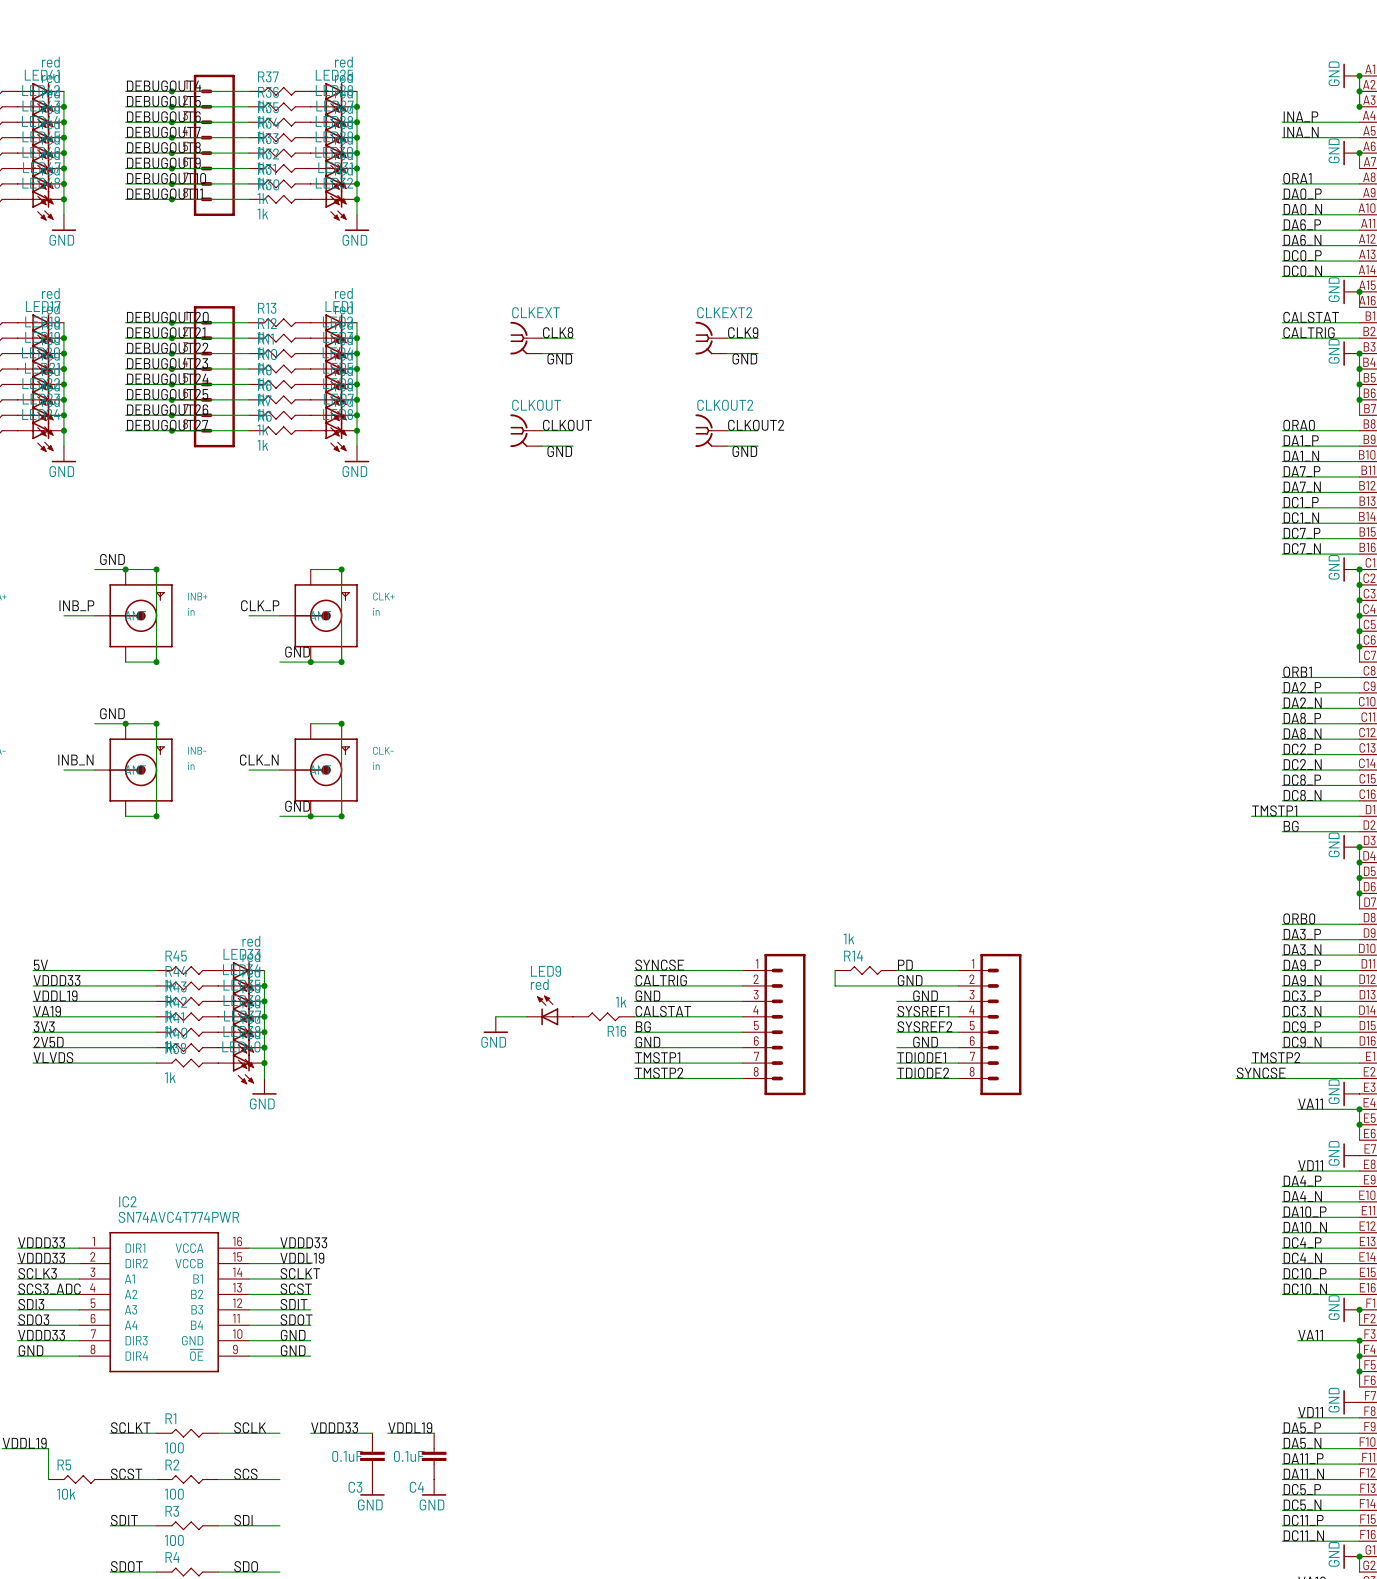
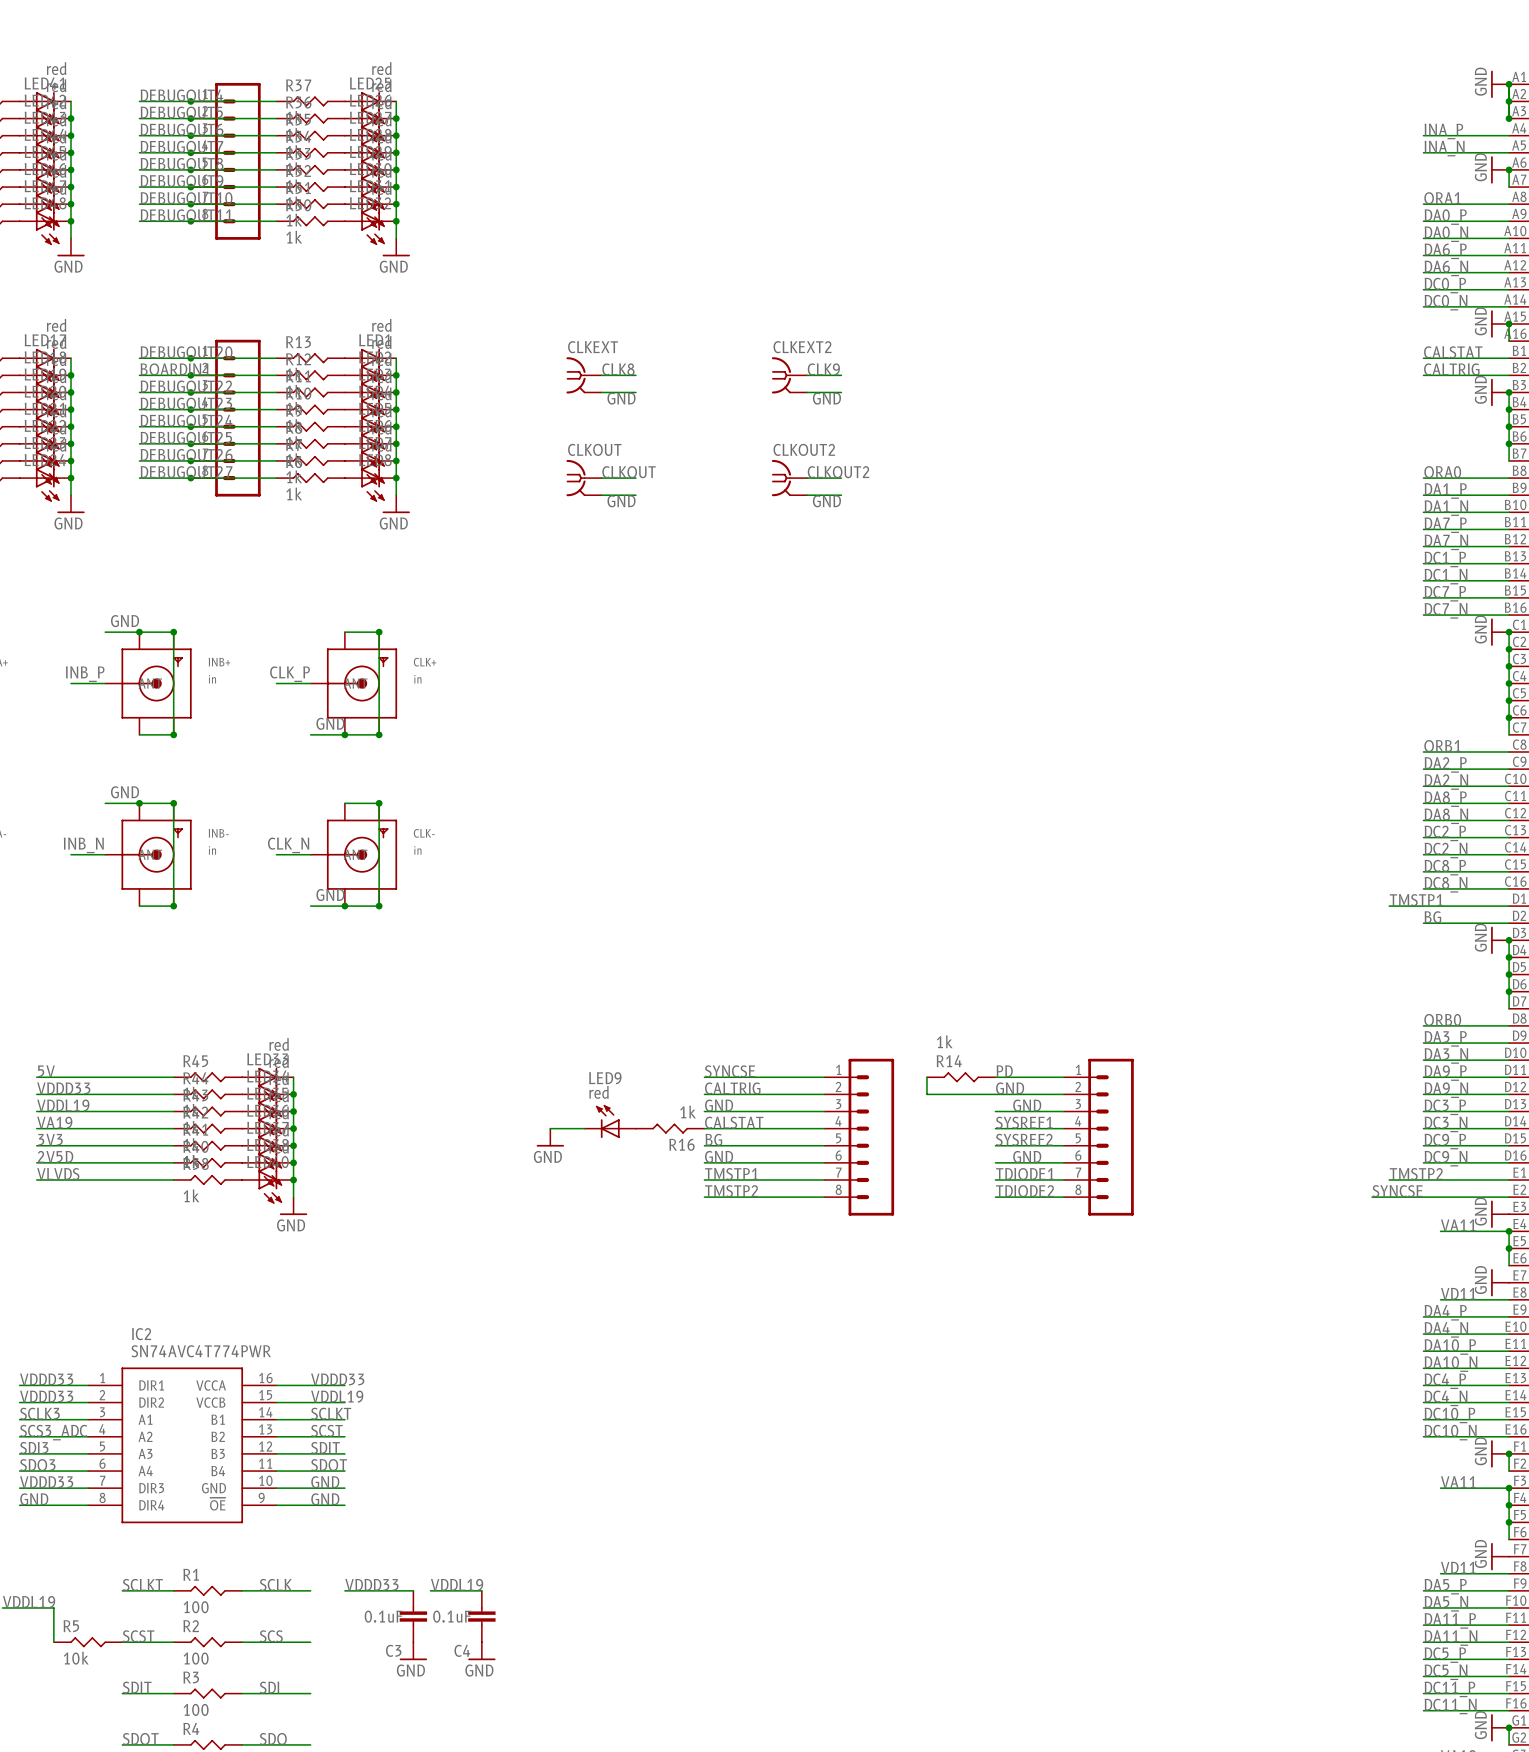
label: DEBUGOUT21 (166, 332) -> BOARDIN1 (175, 369)

